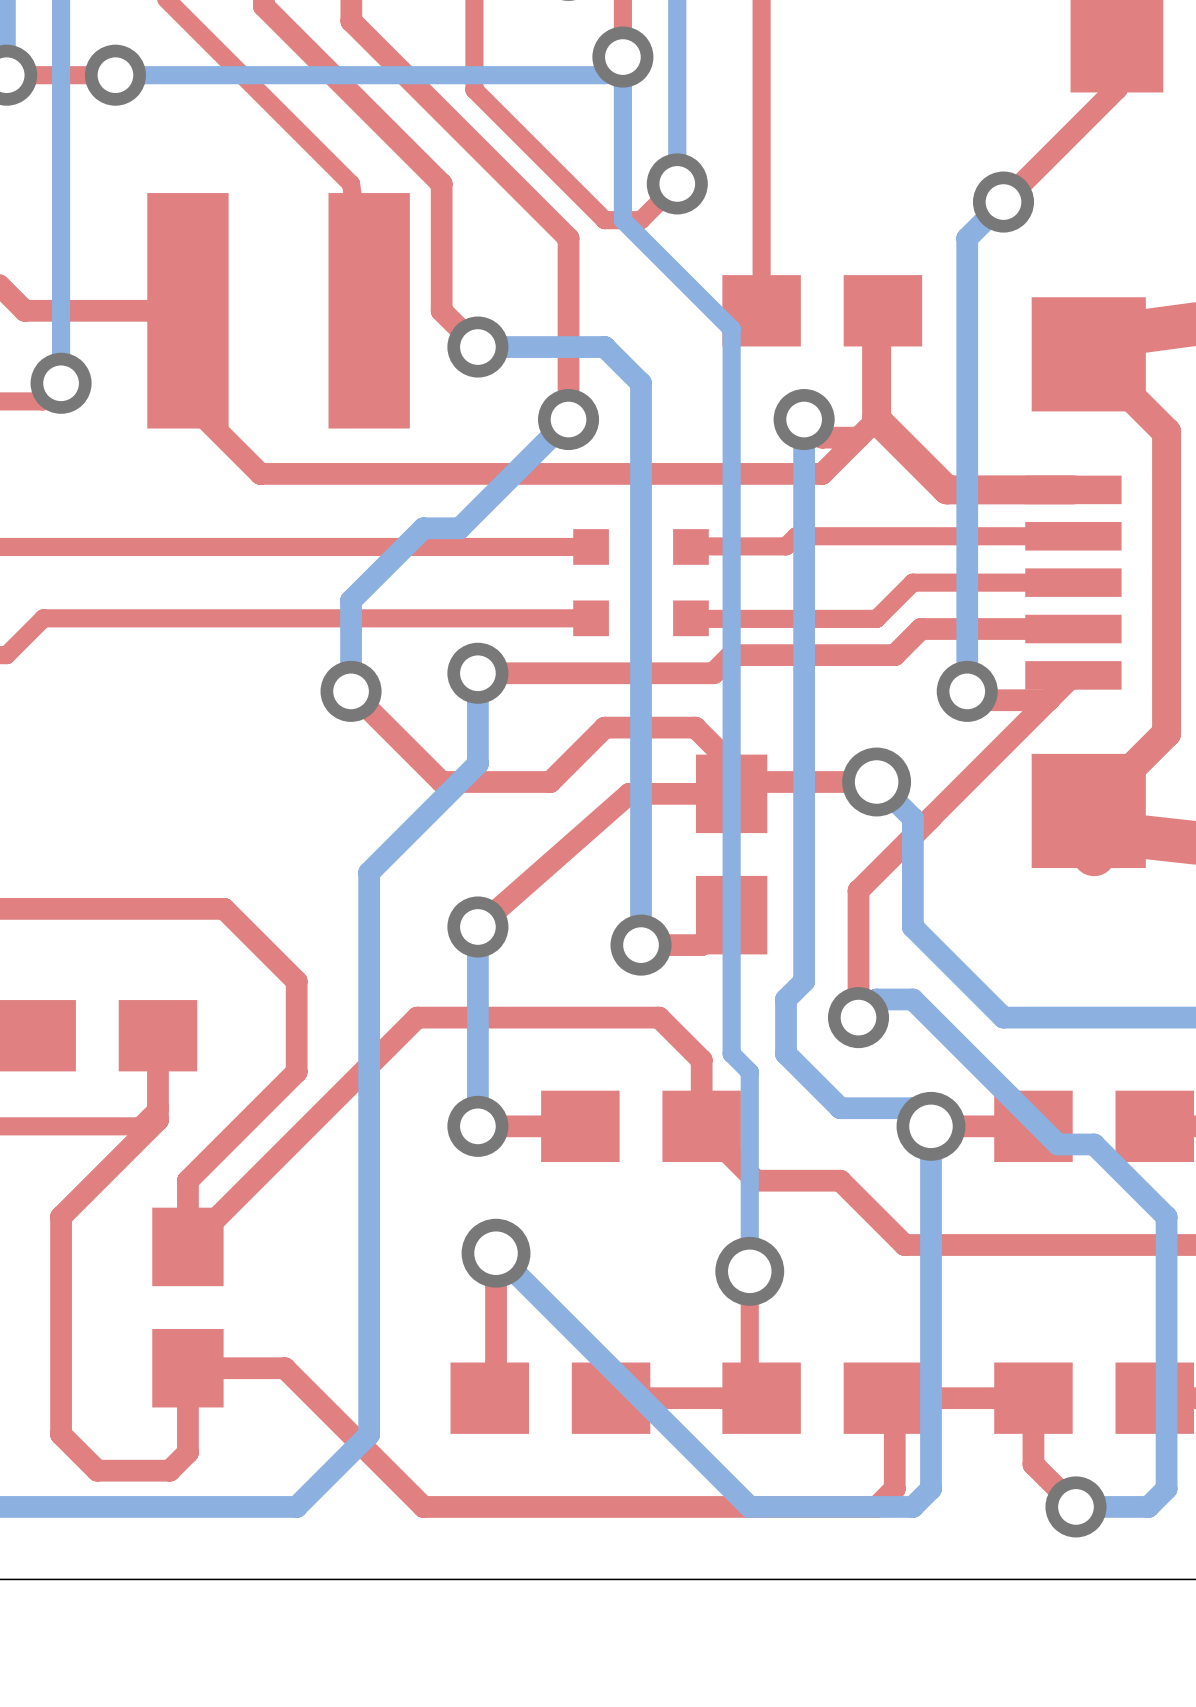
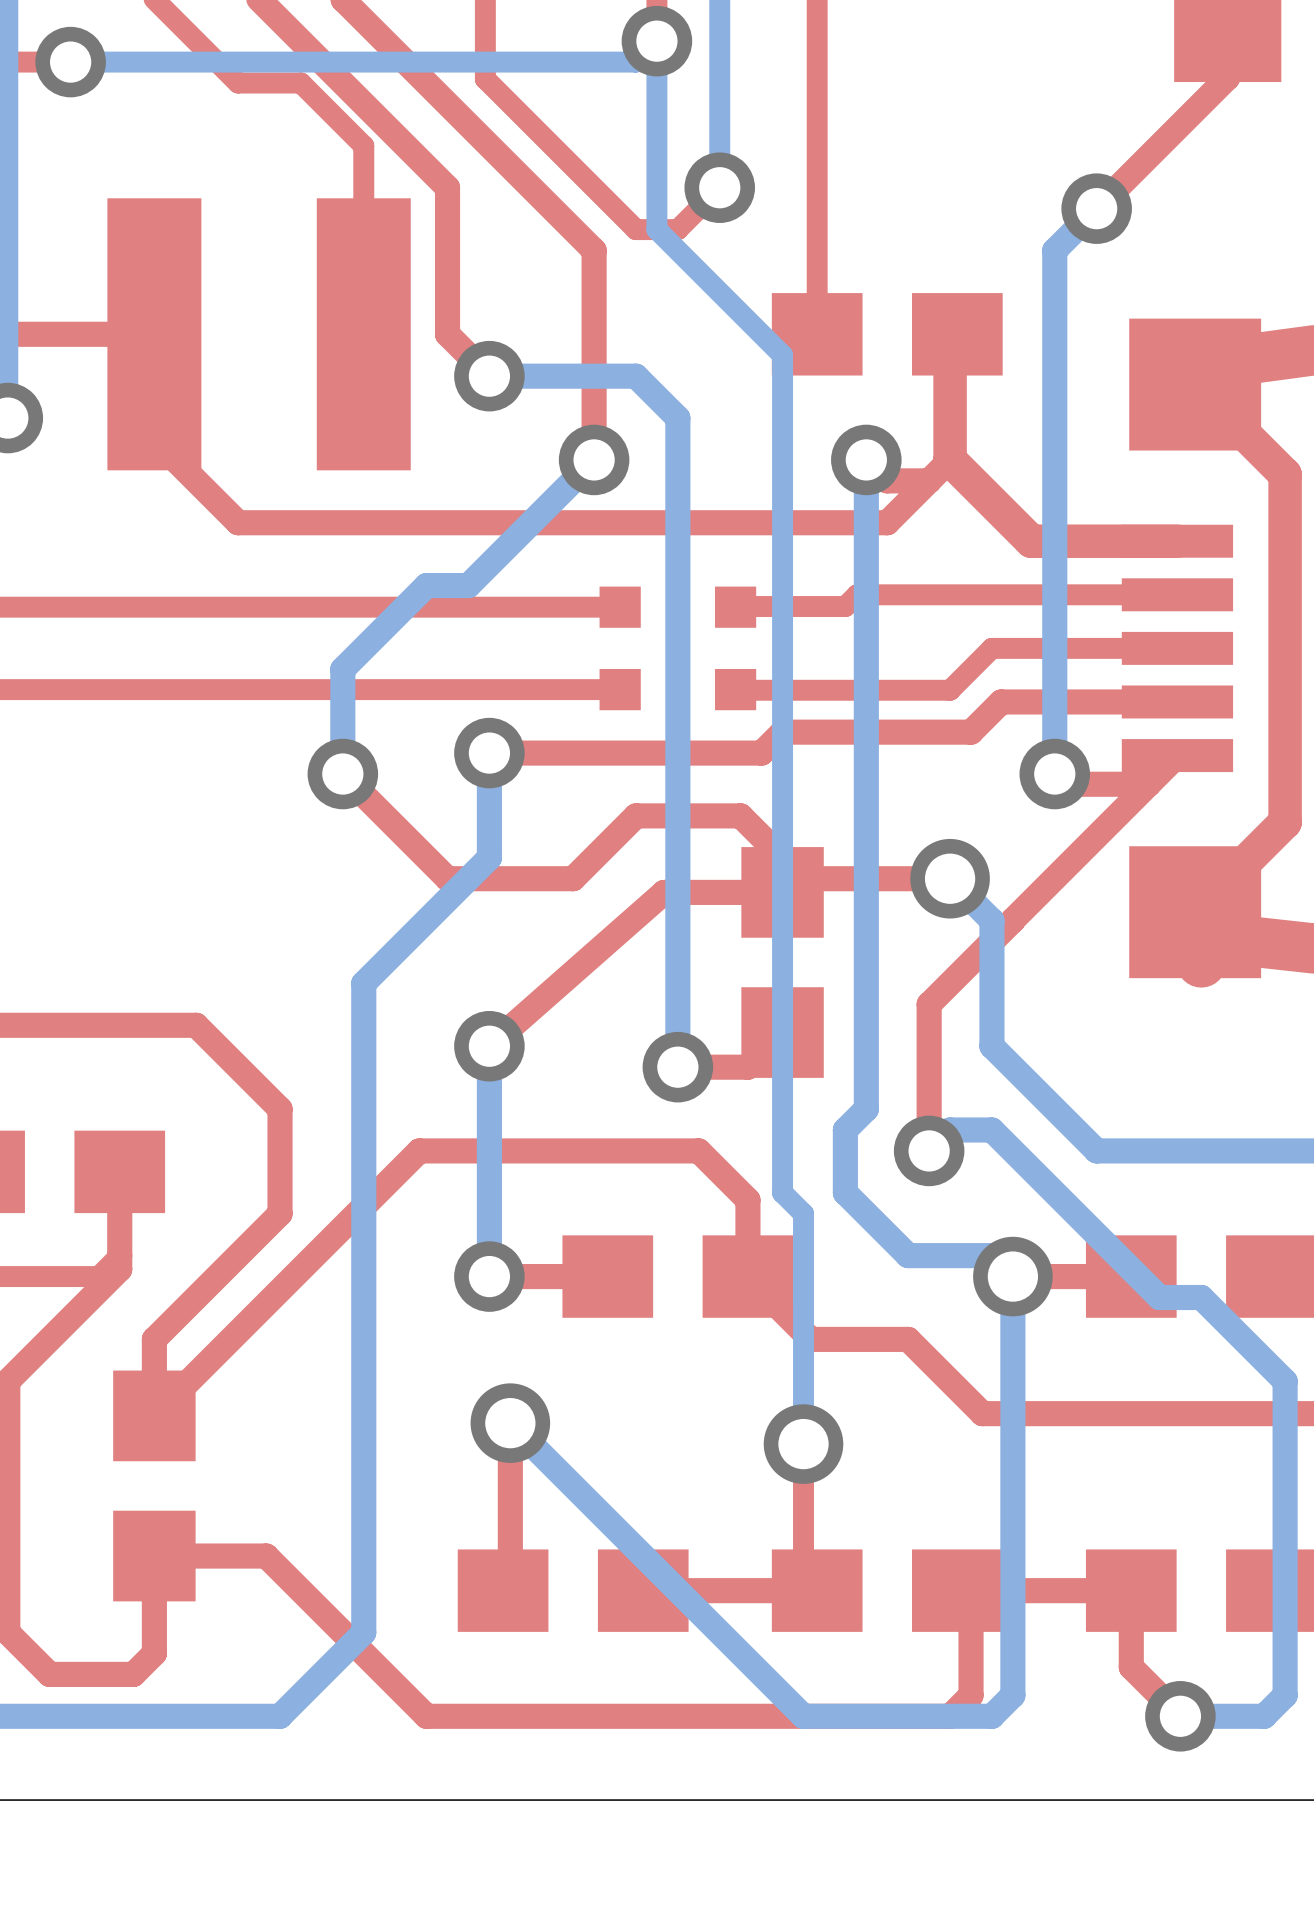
top track: (260, 93) (351, 183) (369, 310) -> (238, 83) (300, 83) (363, 145) (363, 334)

